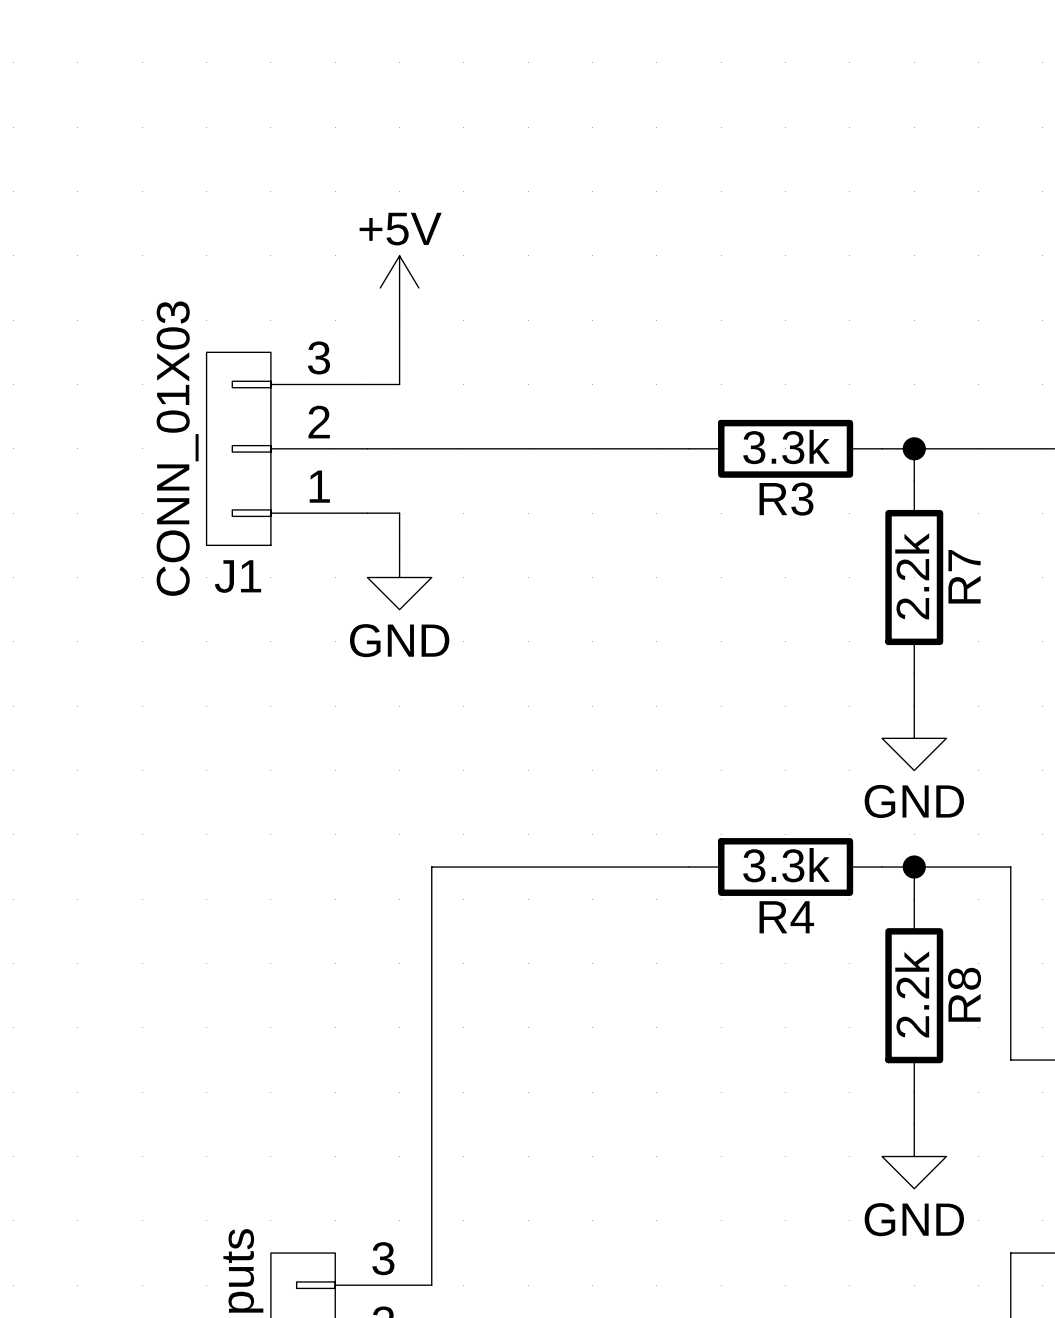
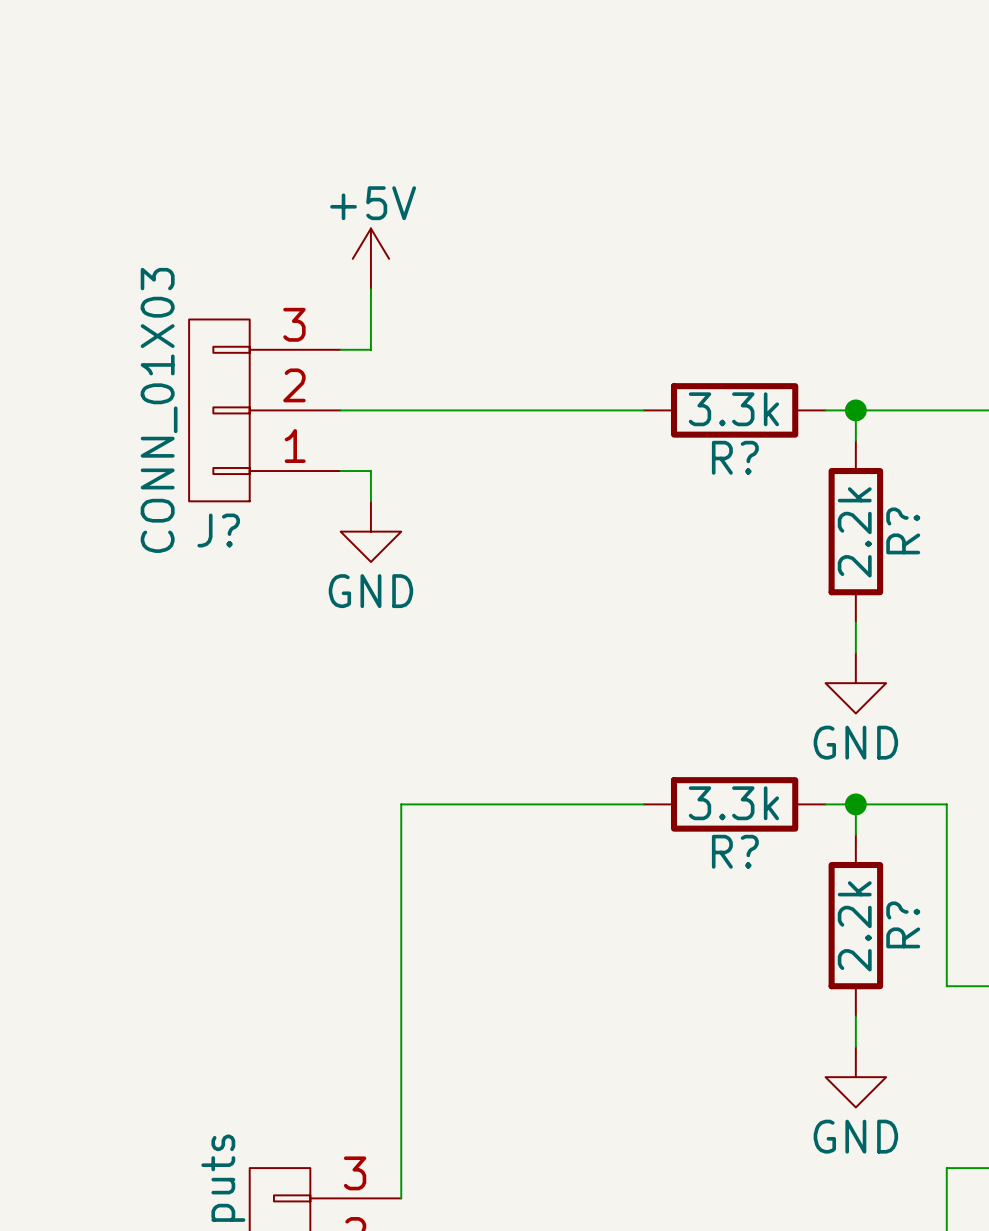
R3 name: R3 (786, 499) -> R? (735, 457)
J1 name: J1 (237, 576) -> J? (218, 530)
R7 name: R7 (964, 576) -> R? (903, 530)
R4 name: R4 (786, 917) -> R? (735, 851)
R8 name: R8 (964, 994) -> R? (903, 924)

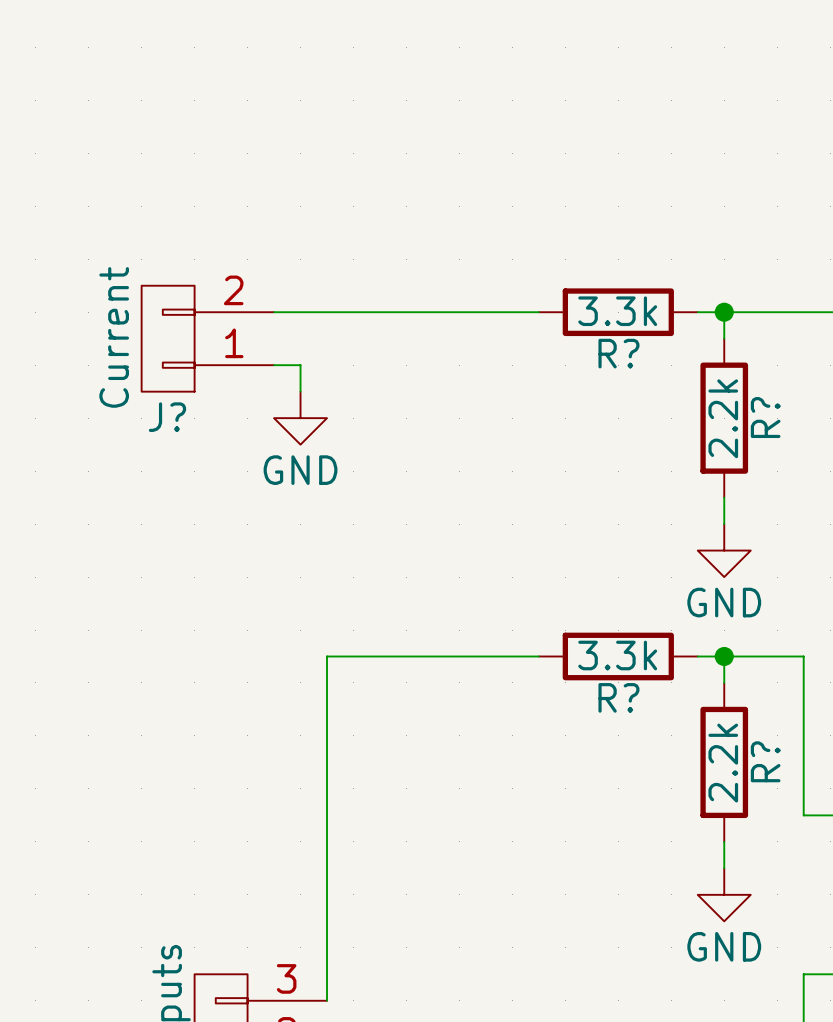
power symbol: +5V (370, 258) -> none
wire: (370, 289) (370, 349) (340, 349) -> none
J?: CONN_01X03 (264, 410) -> none
J?: none -> Current (207, 338)

